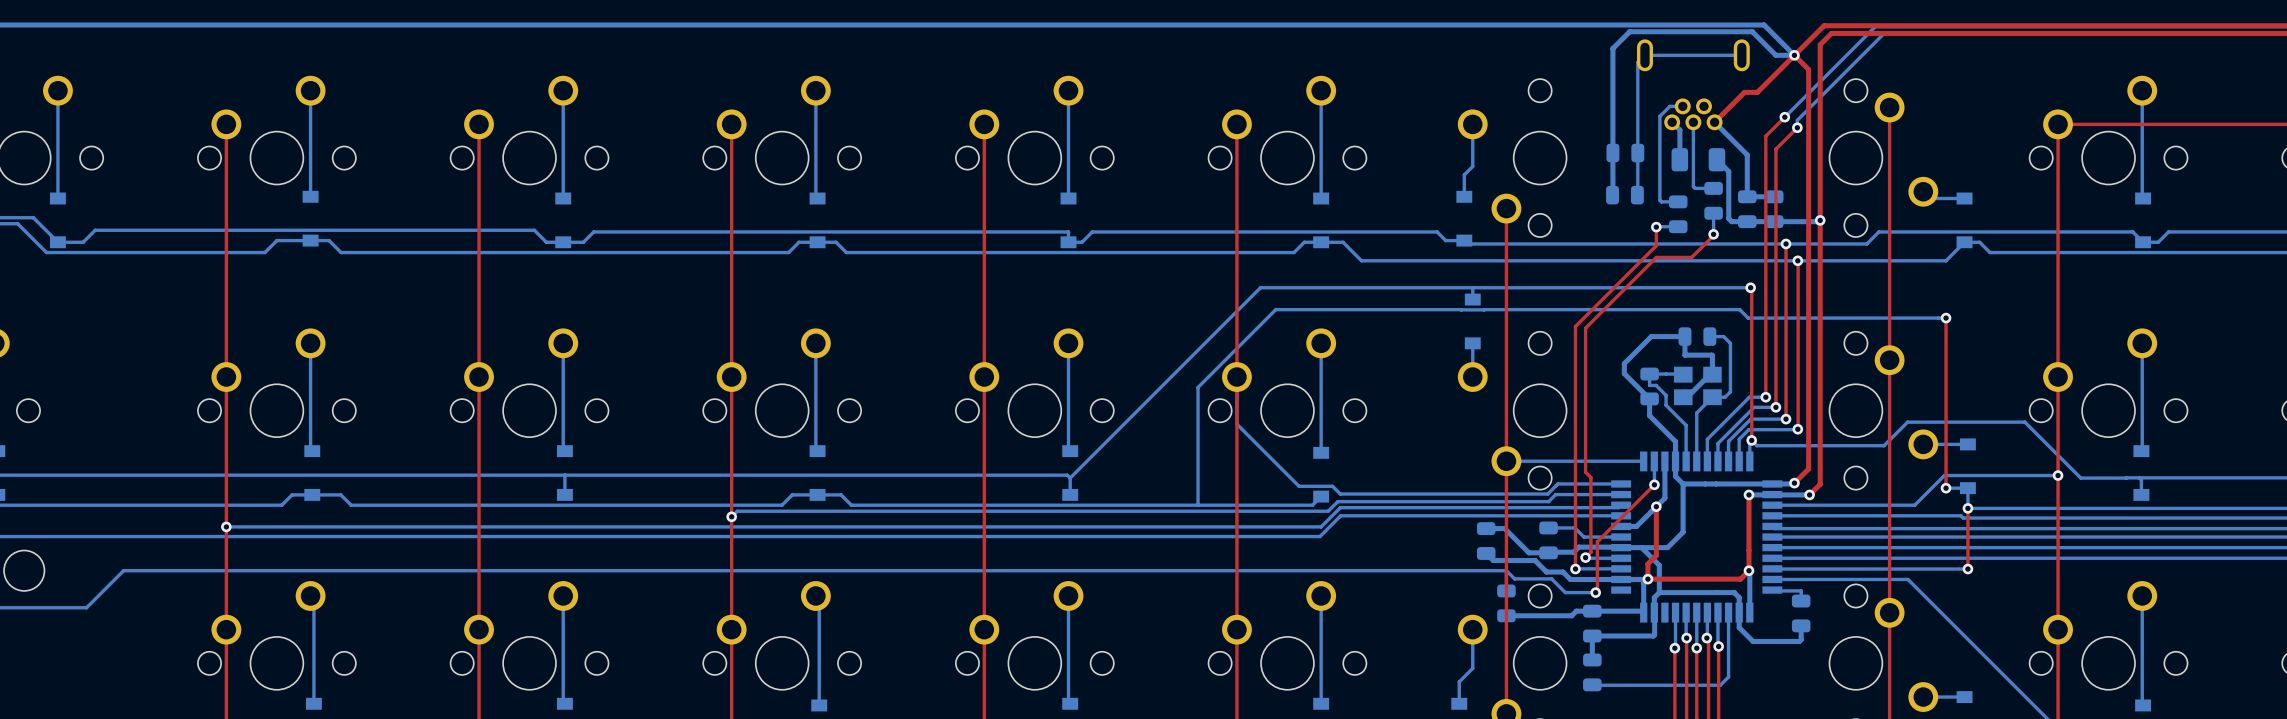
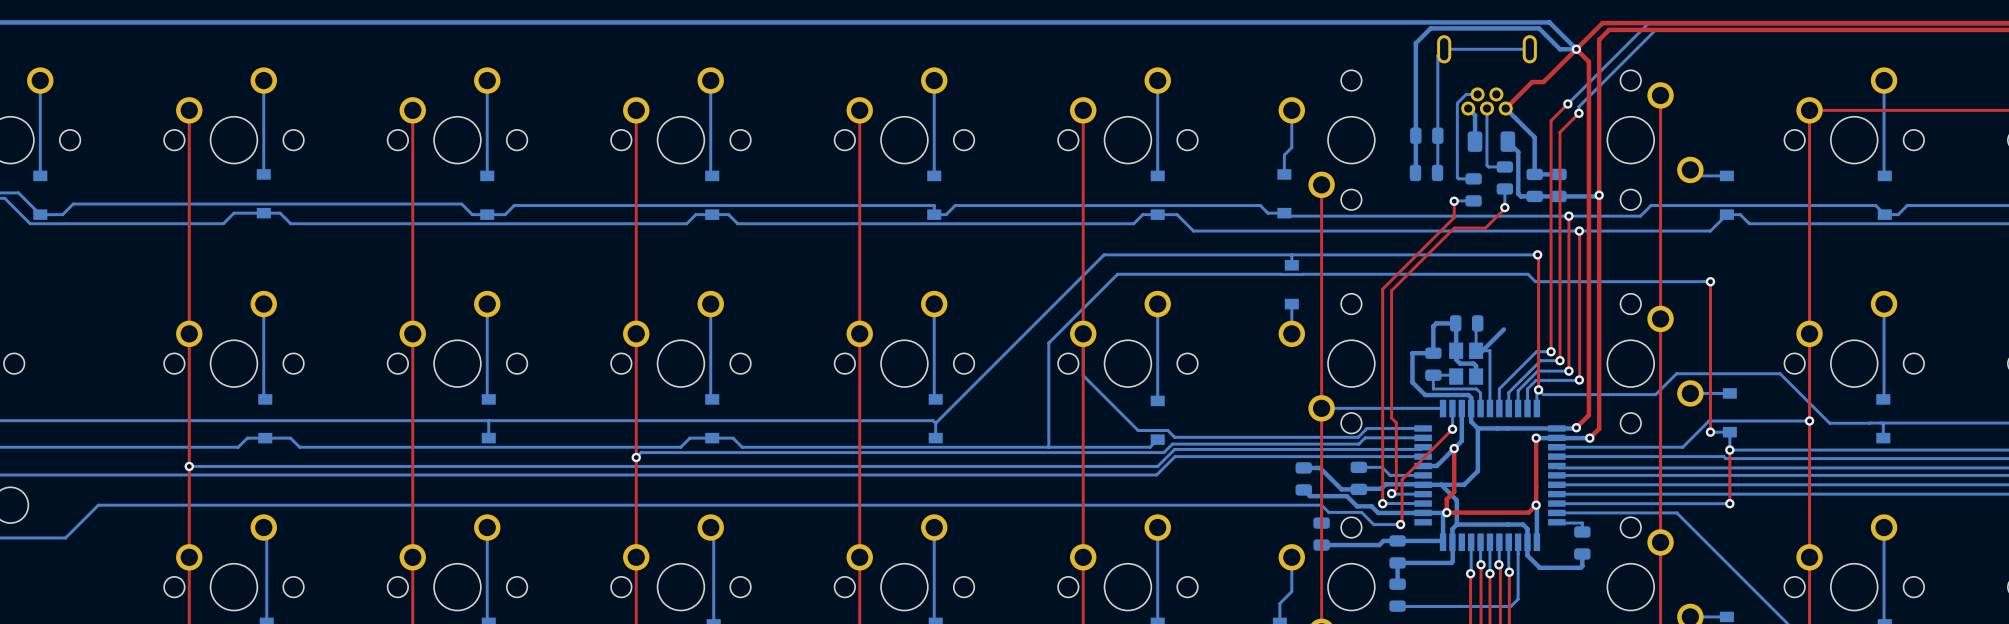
part: (1697, 336) -> none
bottom track: (1709, 336) (1723, 336) (1730, 343) (1730, 391) (1725, 397) (1712, 397) -> none
part: none -> (1466, 323)
bottom track: (1683, 374) (1649, 374) (1649, 385) (1656, 385) (1666, 395) (1666, 405) (1686, 425) (1686, 443) -> (1455, 377) (1454, 375) (1433, 375) (1433, 388) (1476, 388) (1480, 392)
bottom track: (1712, 374) (1712, 355) (1684, 355) (1684, 336) (1651, 336) (1624, 363) (1624, 373) (1649, 398) (1649, 415) (1675, 441) (1675, 449) -> (1476, 376) (1476, 366) (1473, 363) (1460, 363) (1456, 359) (1455, 323) (1436, 323) (1433, 326) (1433, 353) (1412, 353) (1412, 382) (1425, 395) (1468, 395) (1471, 397)
part rotation: 0° (1697, 385) -> 90° clockwise (1466, 363)
part position: (1697, 385) -> (1466, 363)
part: (1649, 386) -> none
bottom track: (1712, 396) (1696, 412) -> (1476, 325) (1476, 350) (1489, 350) (1489, 365)
part: none -> (1433, 364)

